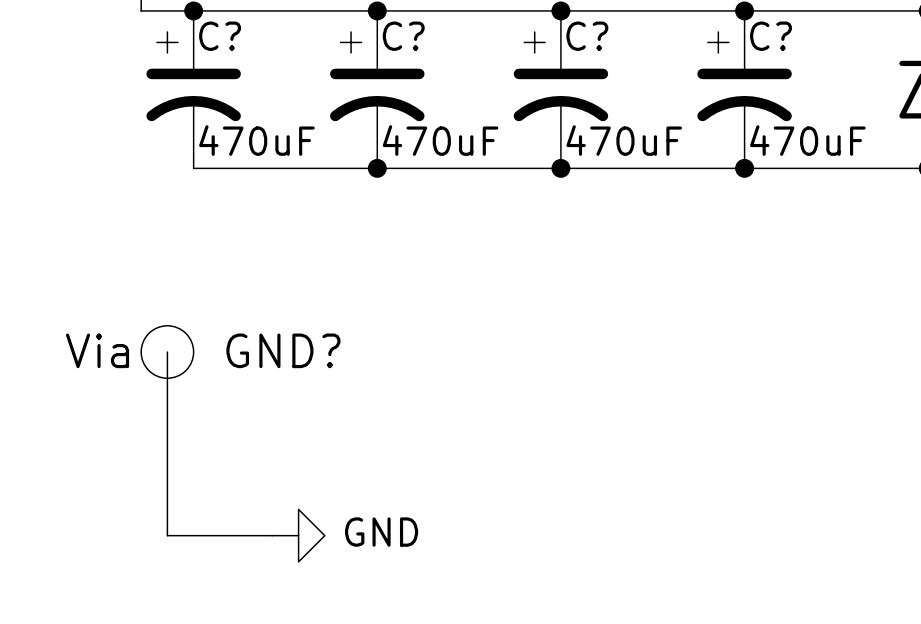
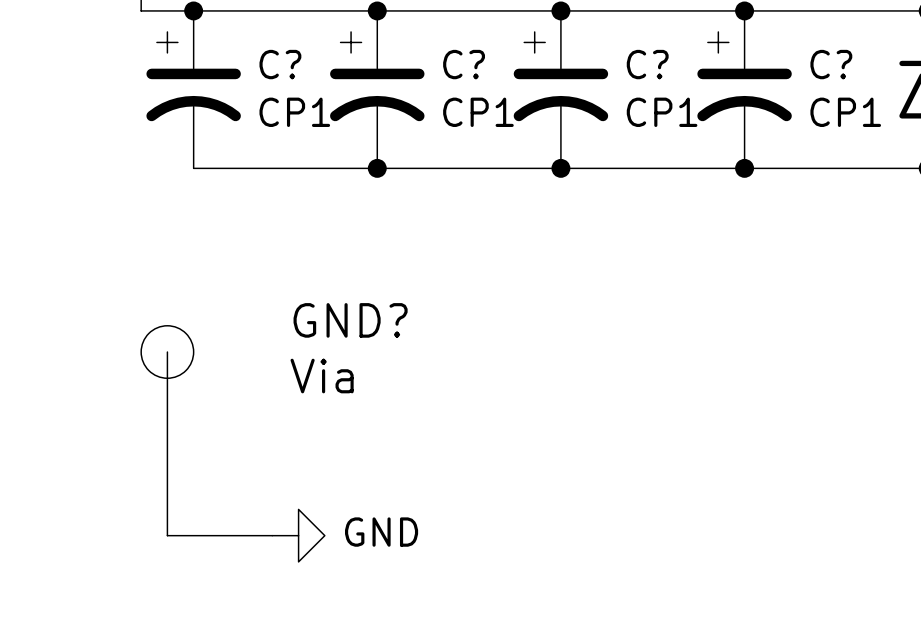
C? name position: C? (220, 36) -> C? (280, 64)
C? name position: C? (403, 36) -> C? (464, 64)
C? name position: C? (587, 36) -> C? (647, 64)
C? name position: C? (771, 36) -> C? (831, 64)
C? value: 470uF (256, 140) -> CP1 (294, 112)
C? value: 470uF (440, 140) -> CP1 (478, 112)
C? value: 470uF (624, 140) -> CP1 (662, 112)
C? value: 470uF (807, 140) -> CP1 (845, 112)
GND? value position: Via (97, 350) -> Via (322, 376)
GND? name position: GND? (283, 350) -> GND? (350, 320)

